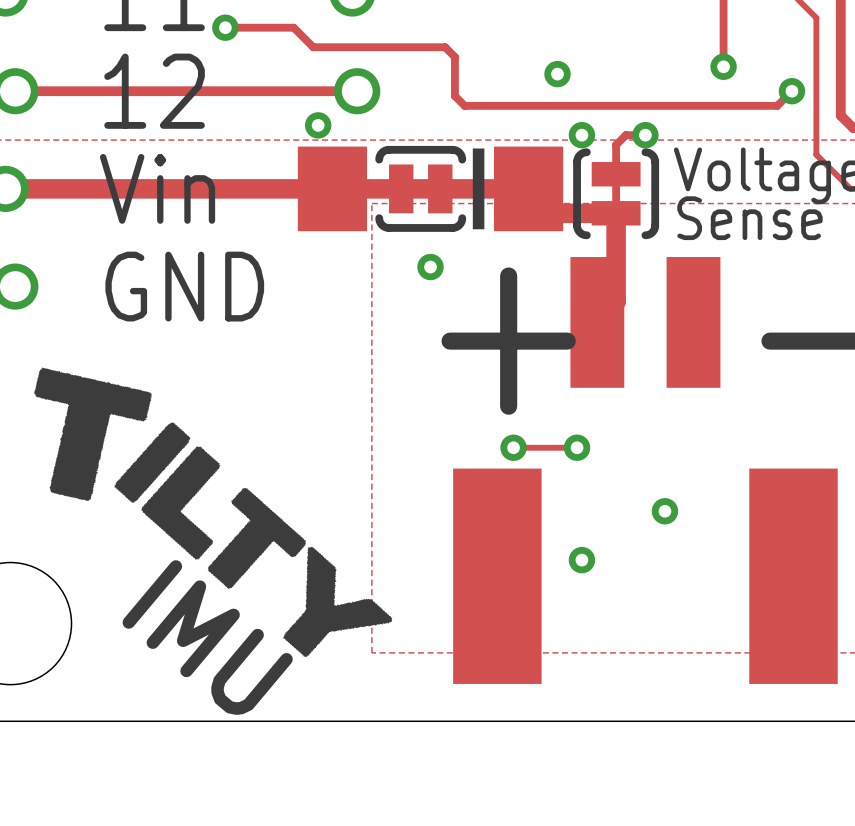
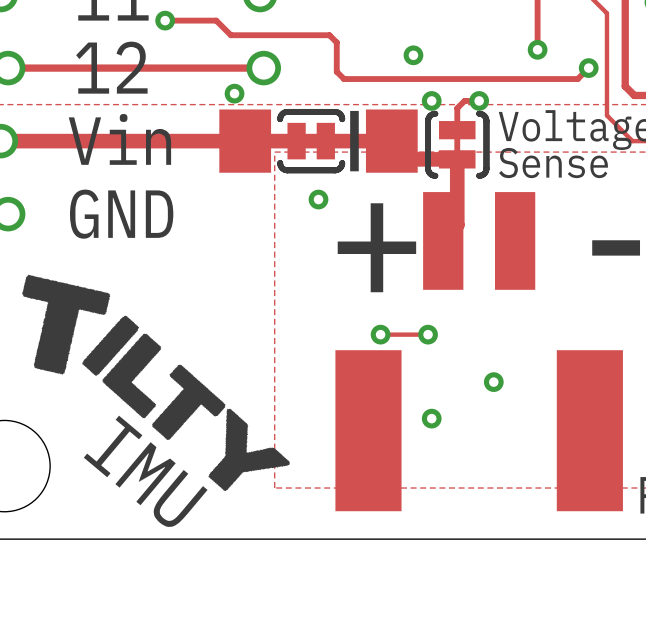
line: none -> (435, 113) (430, 115) (428, 121) (428, 169) (430, 173) (435, 175)
line: none -> (479, 113) (484, 115) (486, 121) (486, 169) (484, 173) (479, 175)
line: none -> (280, 119) (282, 114) (287, 111) (335, 111) (340, 114) (342, 119)
line: none -> (280, 163) (282, 168) (287, 170) (335, 170) (340, 168) (342, 163)

